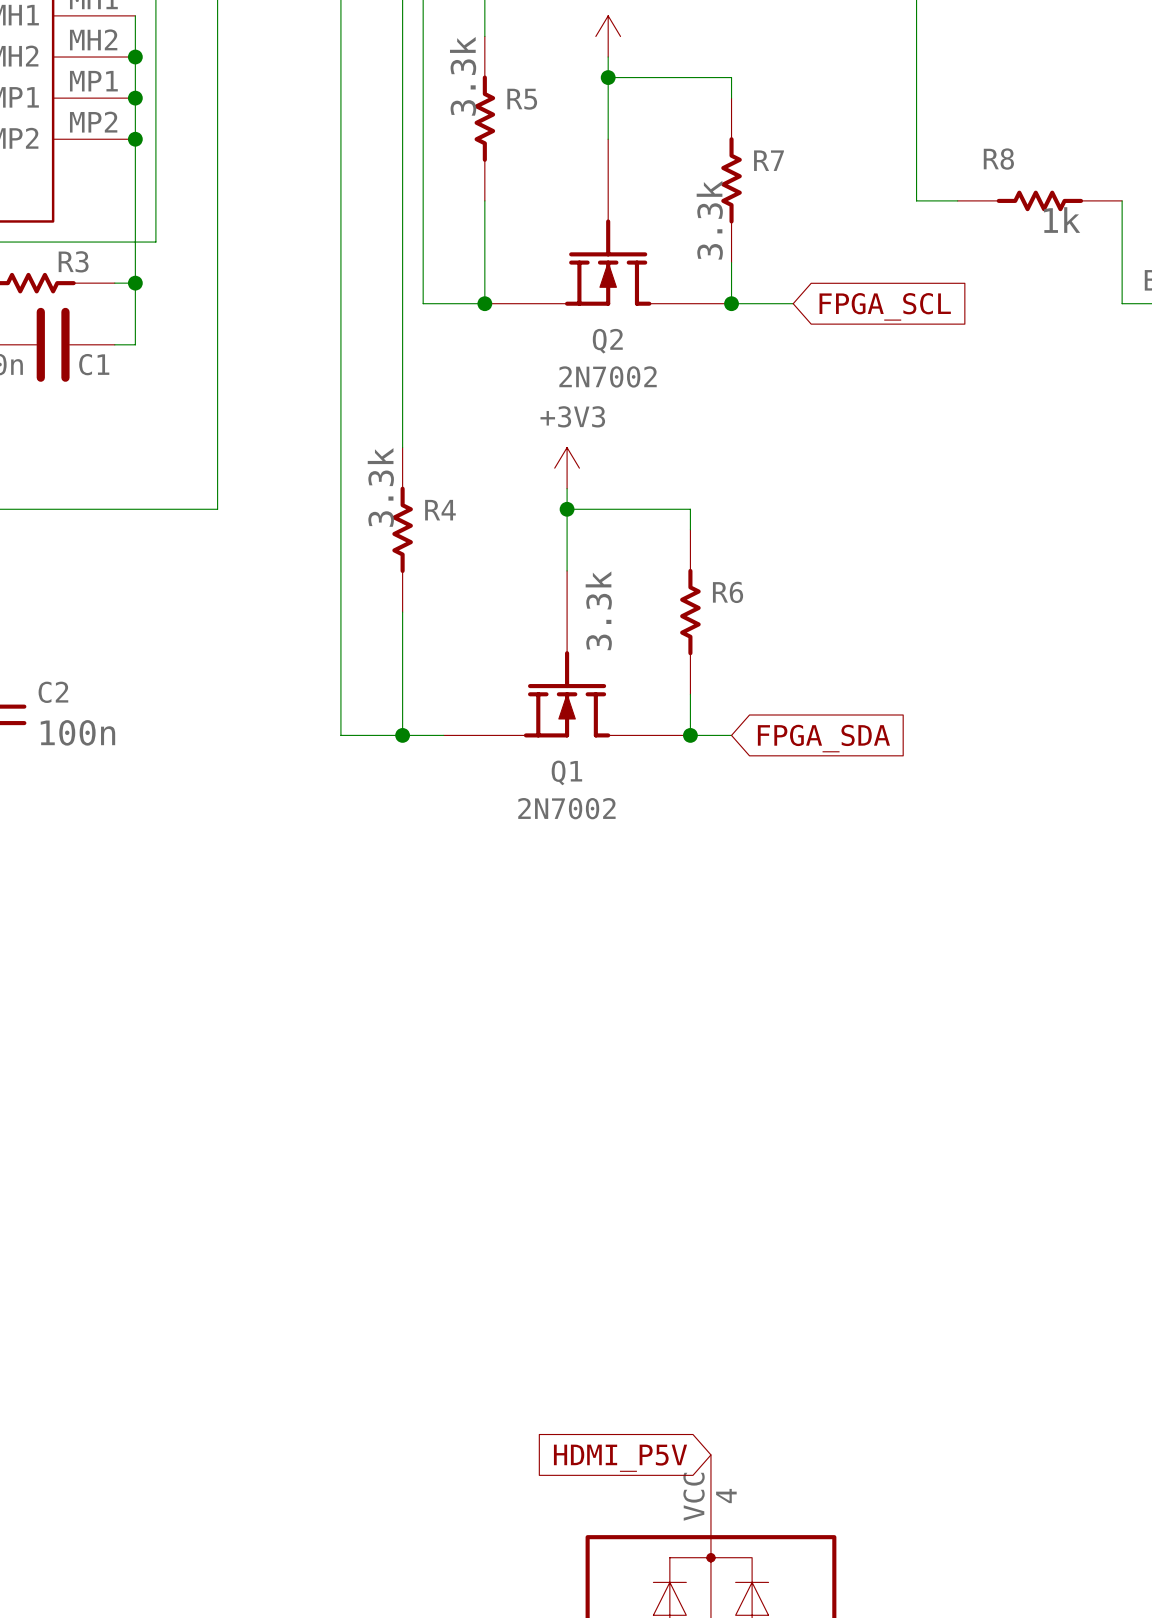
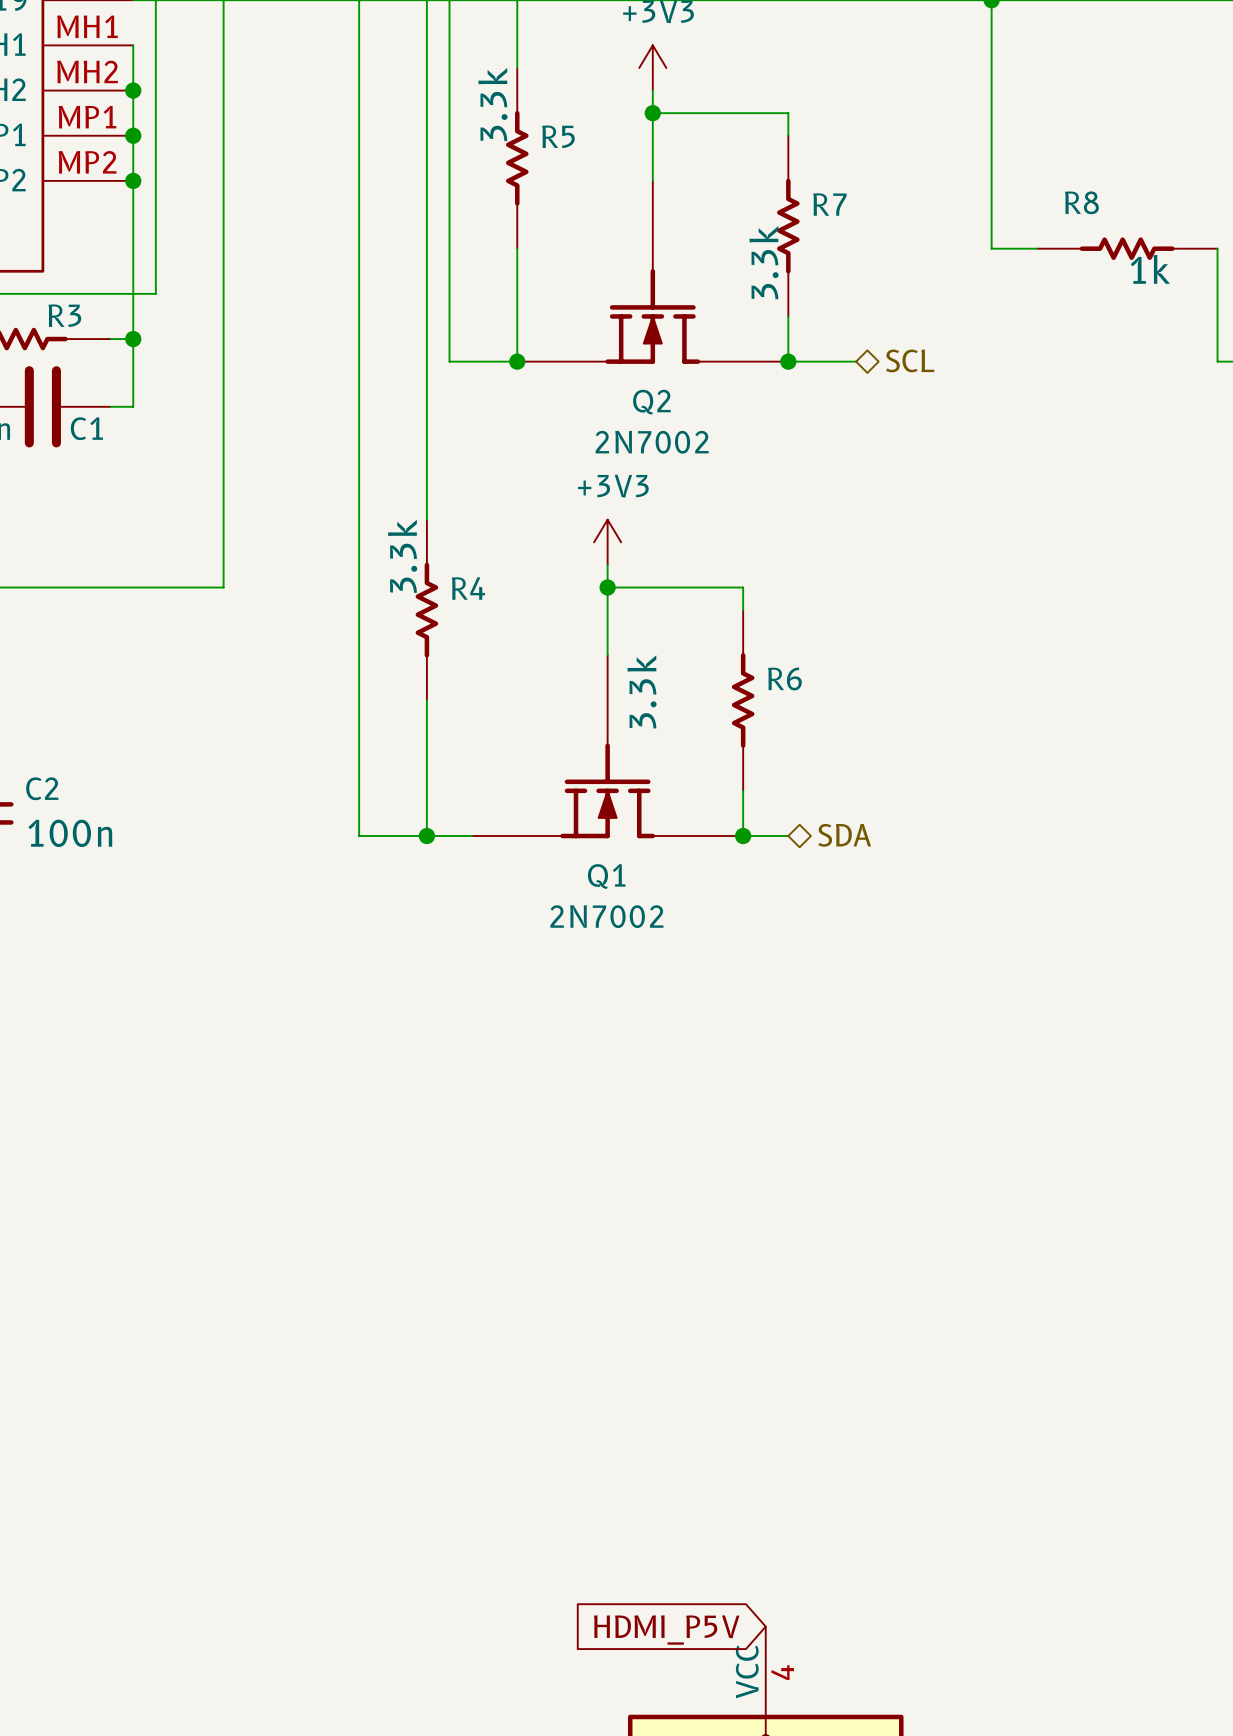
hierarchical label: none -> SCL (910, 360)
global label: FPGA_SCL (885, 306) -> none
hierarchical label: none -> SDA (844, 835)
global label: FPGA_SDA (823, 738) -> none

